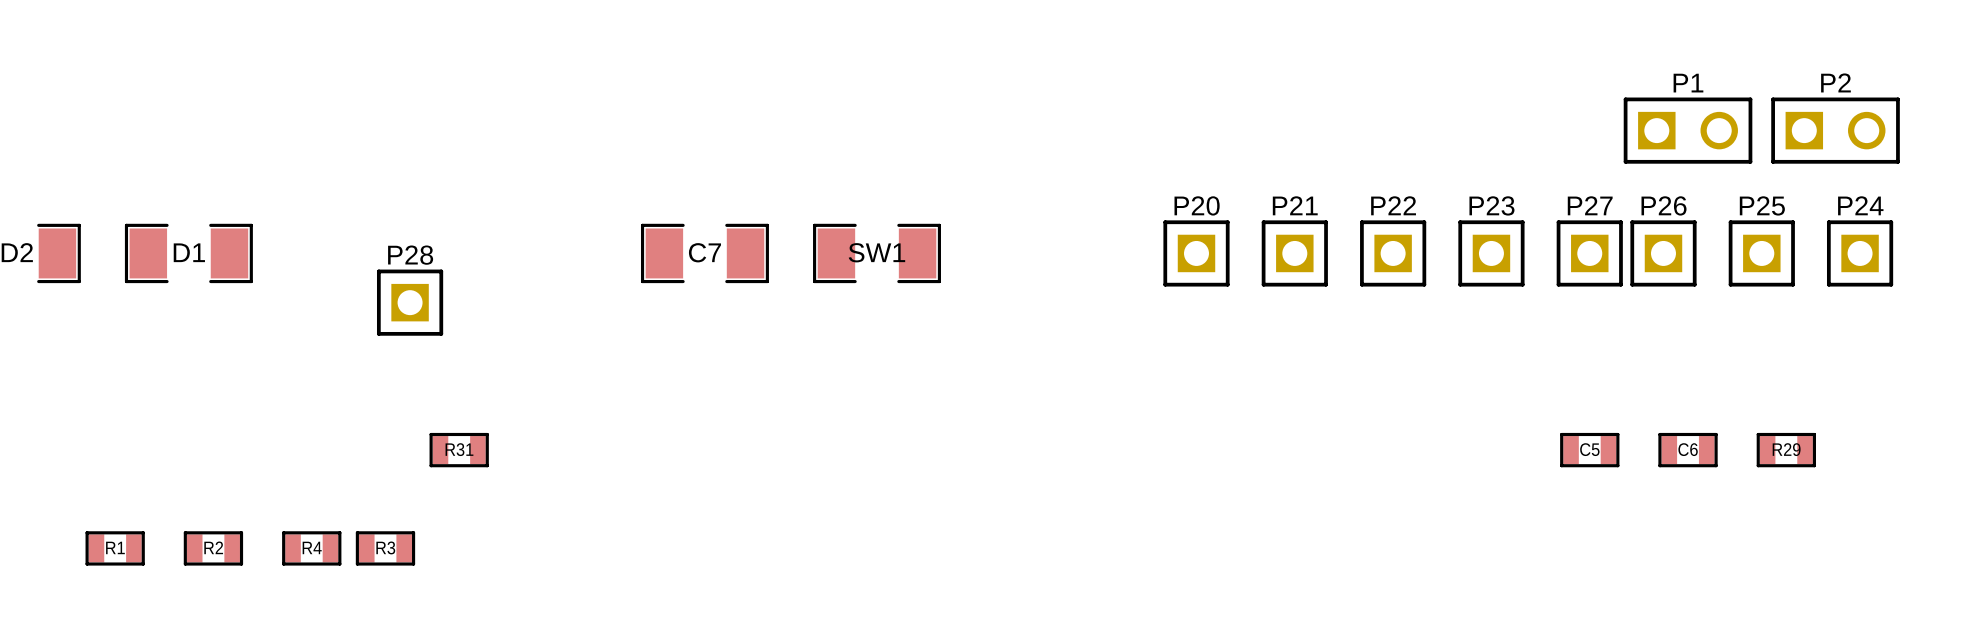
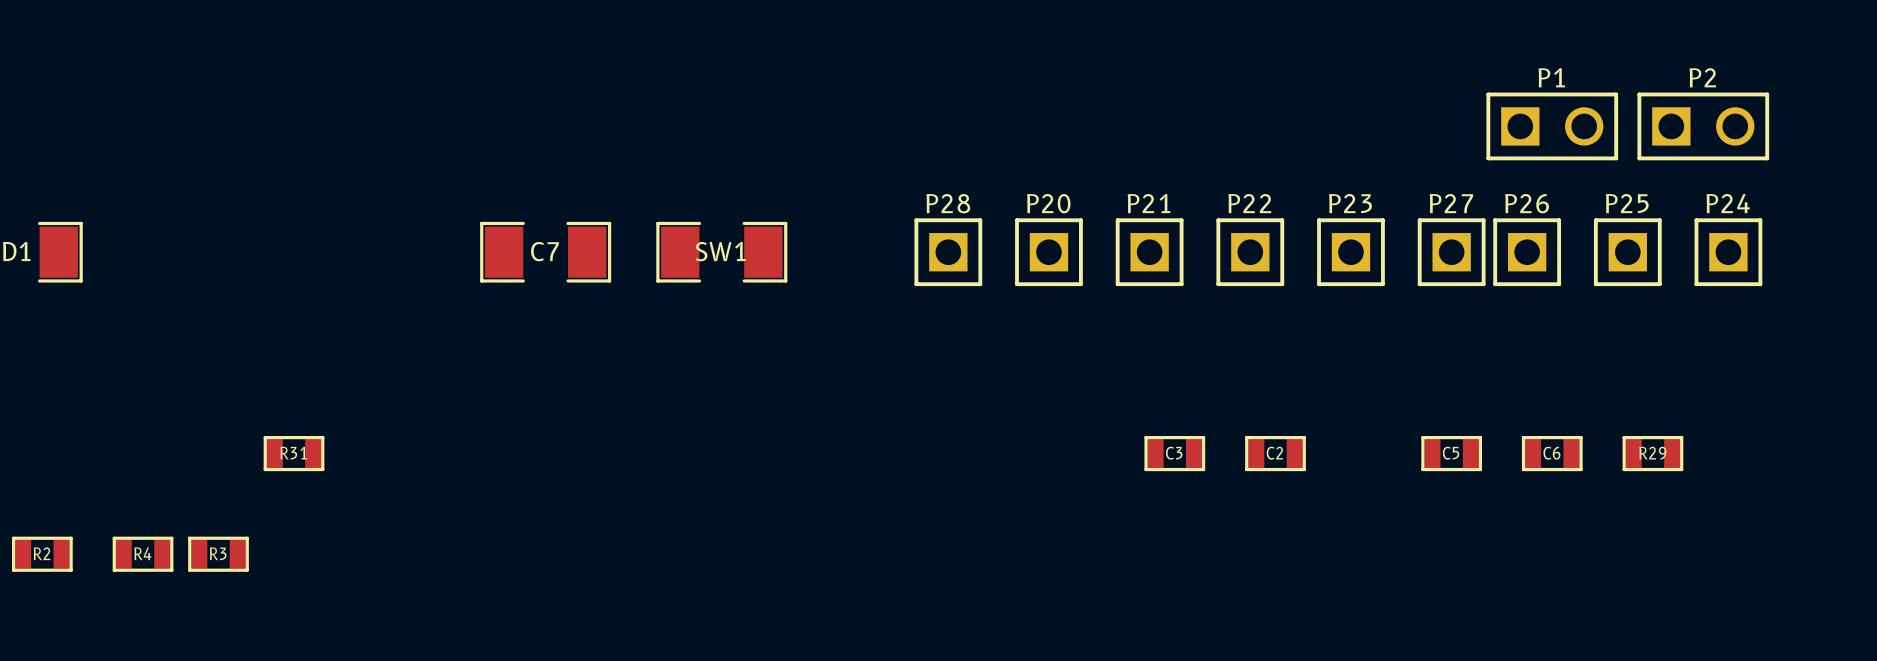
P28 position: (410, 302) -> (948, 252)
C3: none -> (1174, 453)
C2: none -> (1275, 453)

